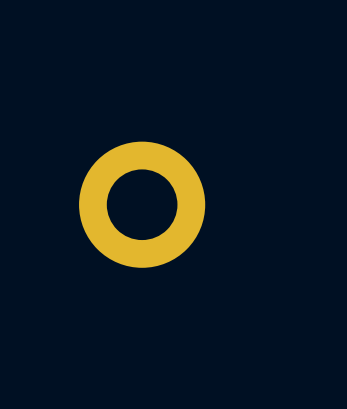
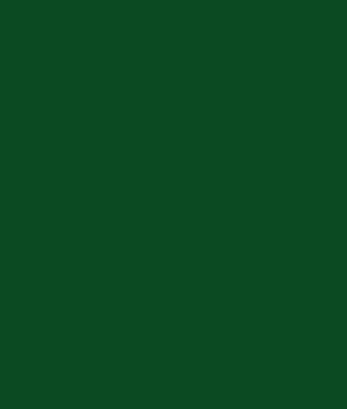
part: (142, 204) -> none

